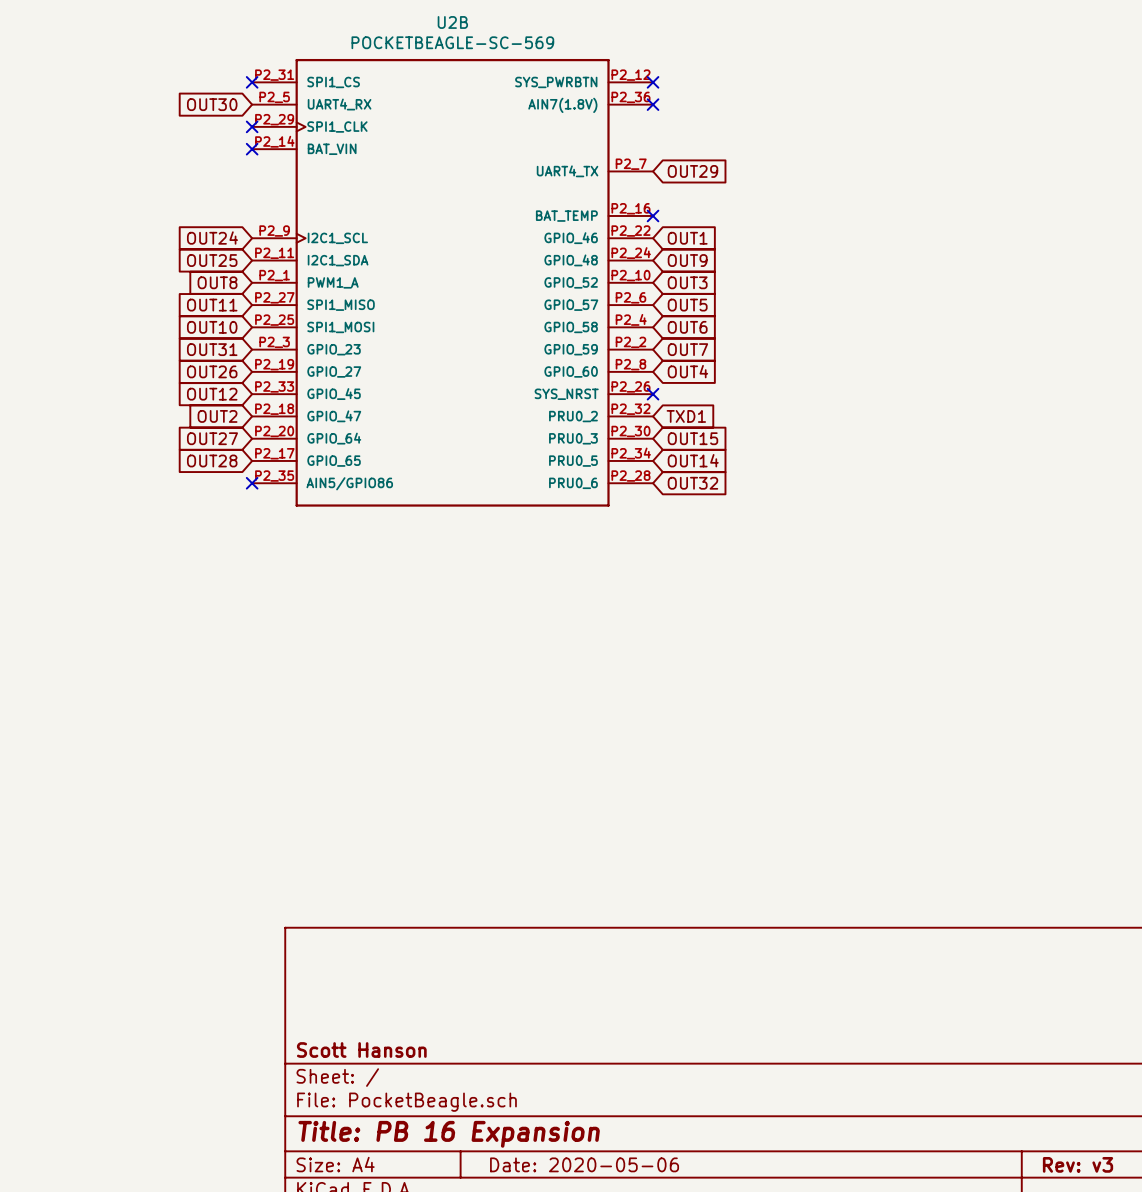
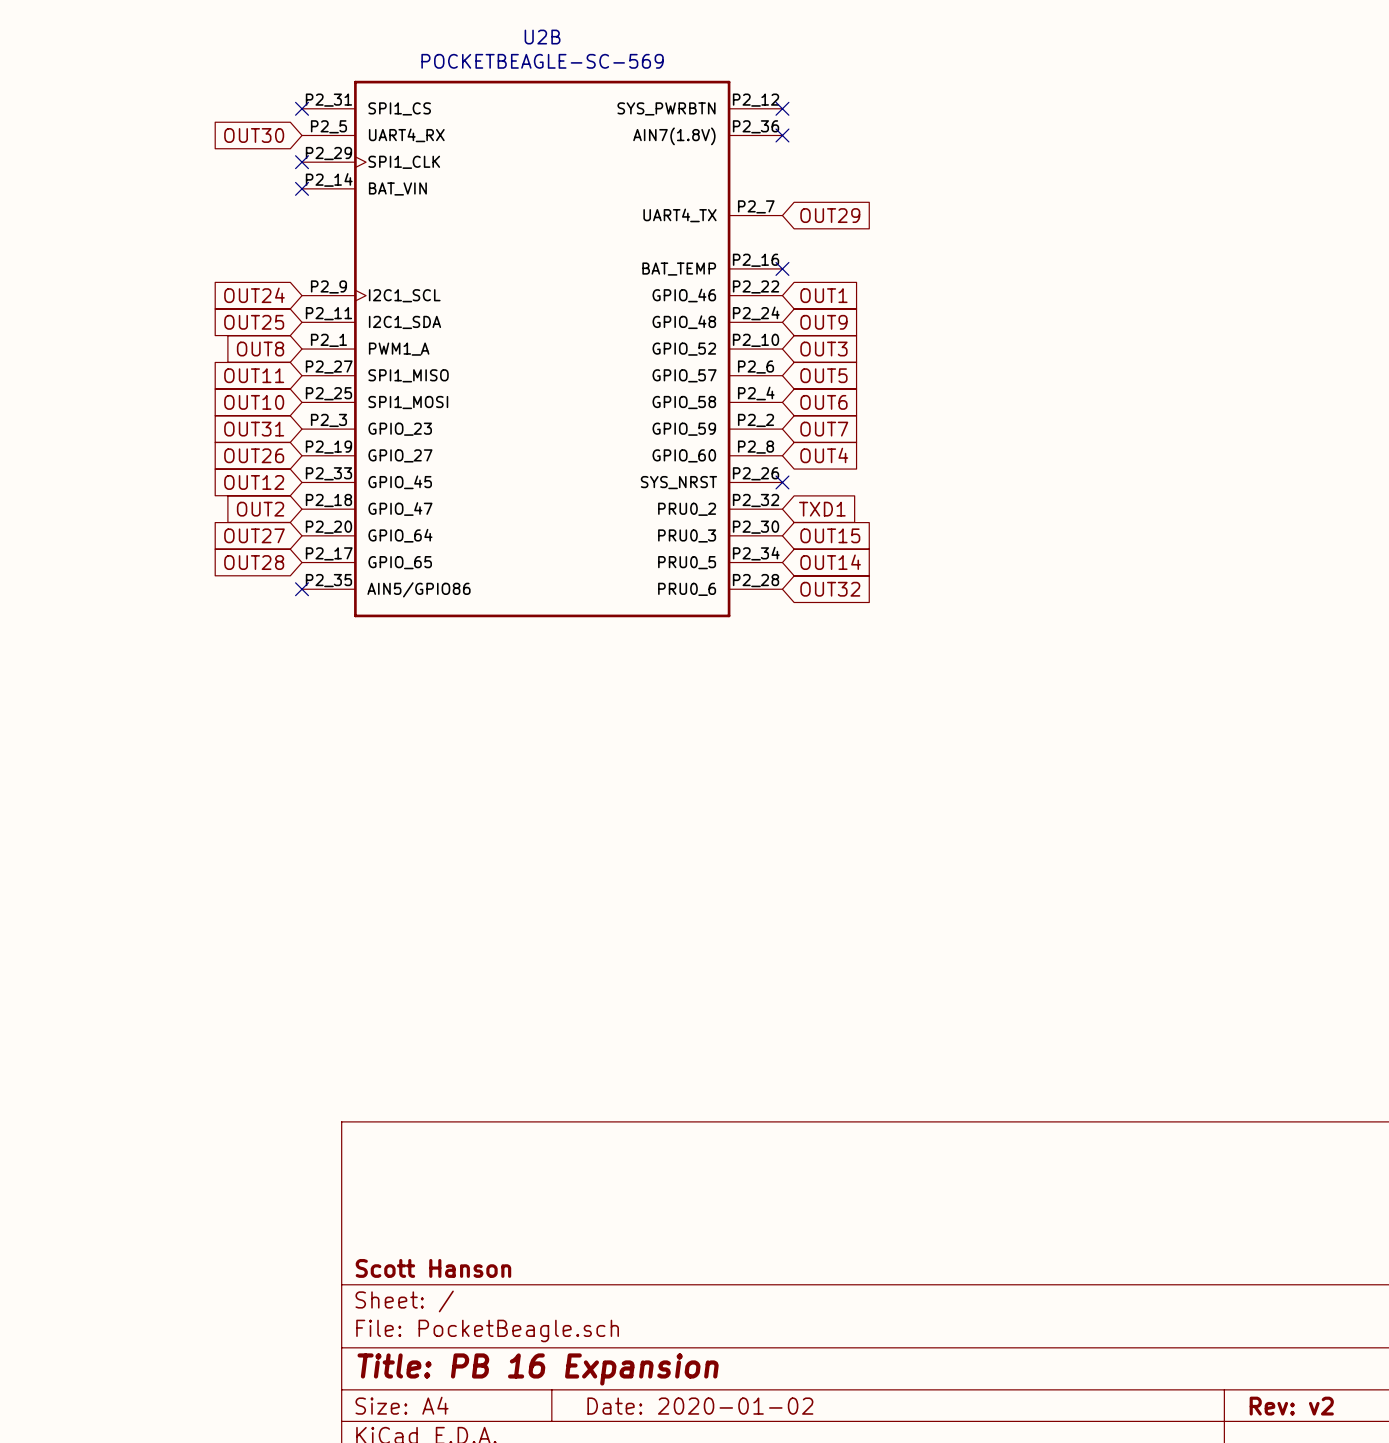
title block: Date: 2020-05-06 (584, 1164) -> Date: 2020-01-02 (700, 1406)
title block: Rev: v3 (1078, 1164) -> Rev: v2 (1291, 1406)

